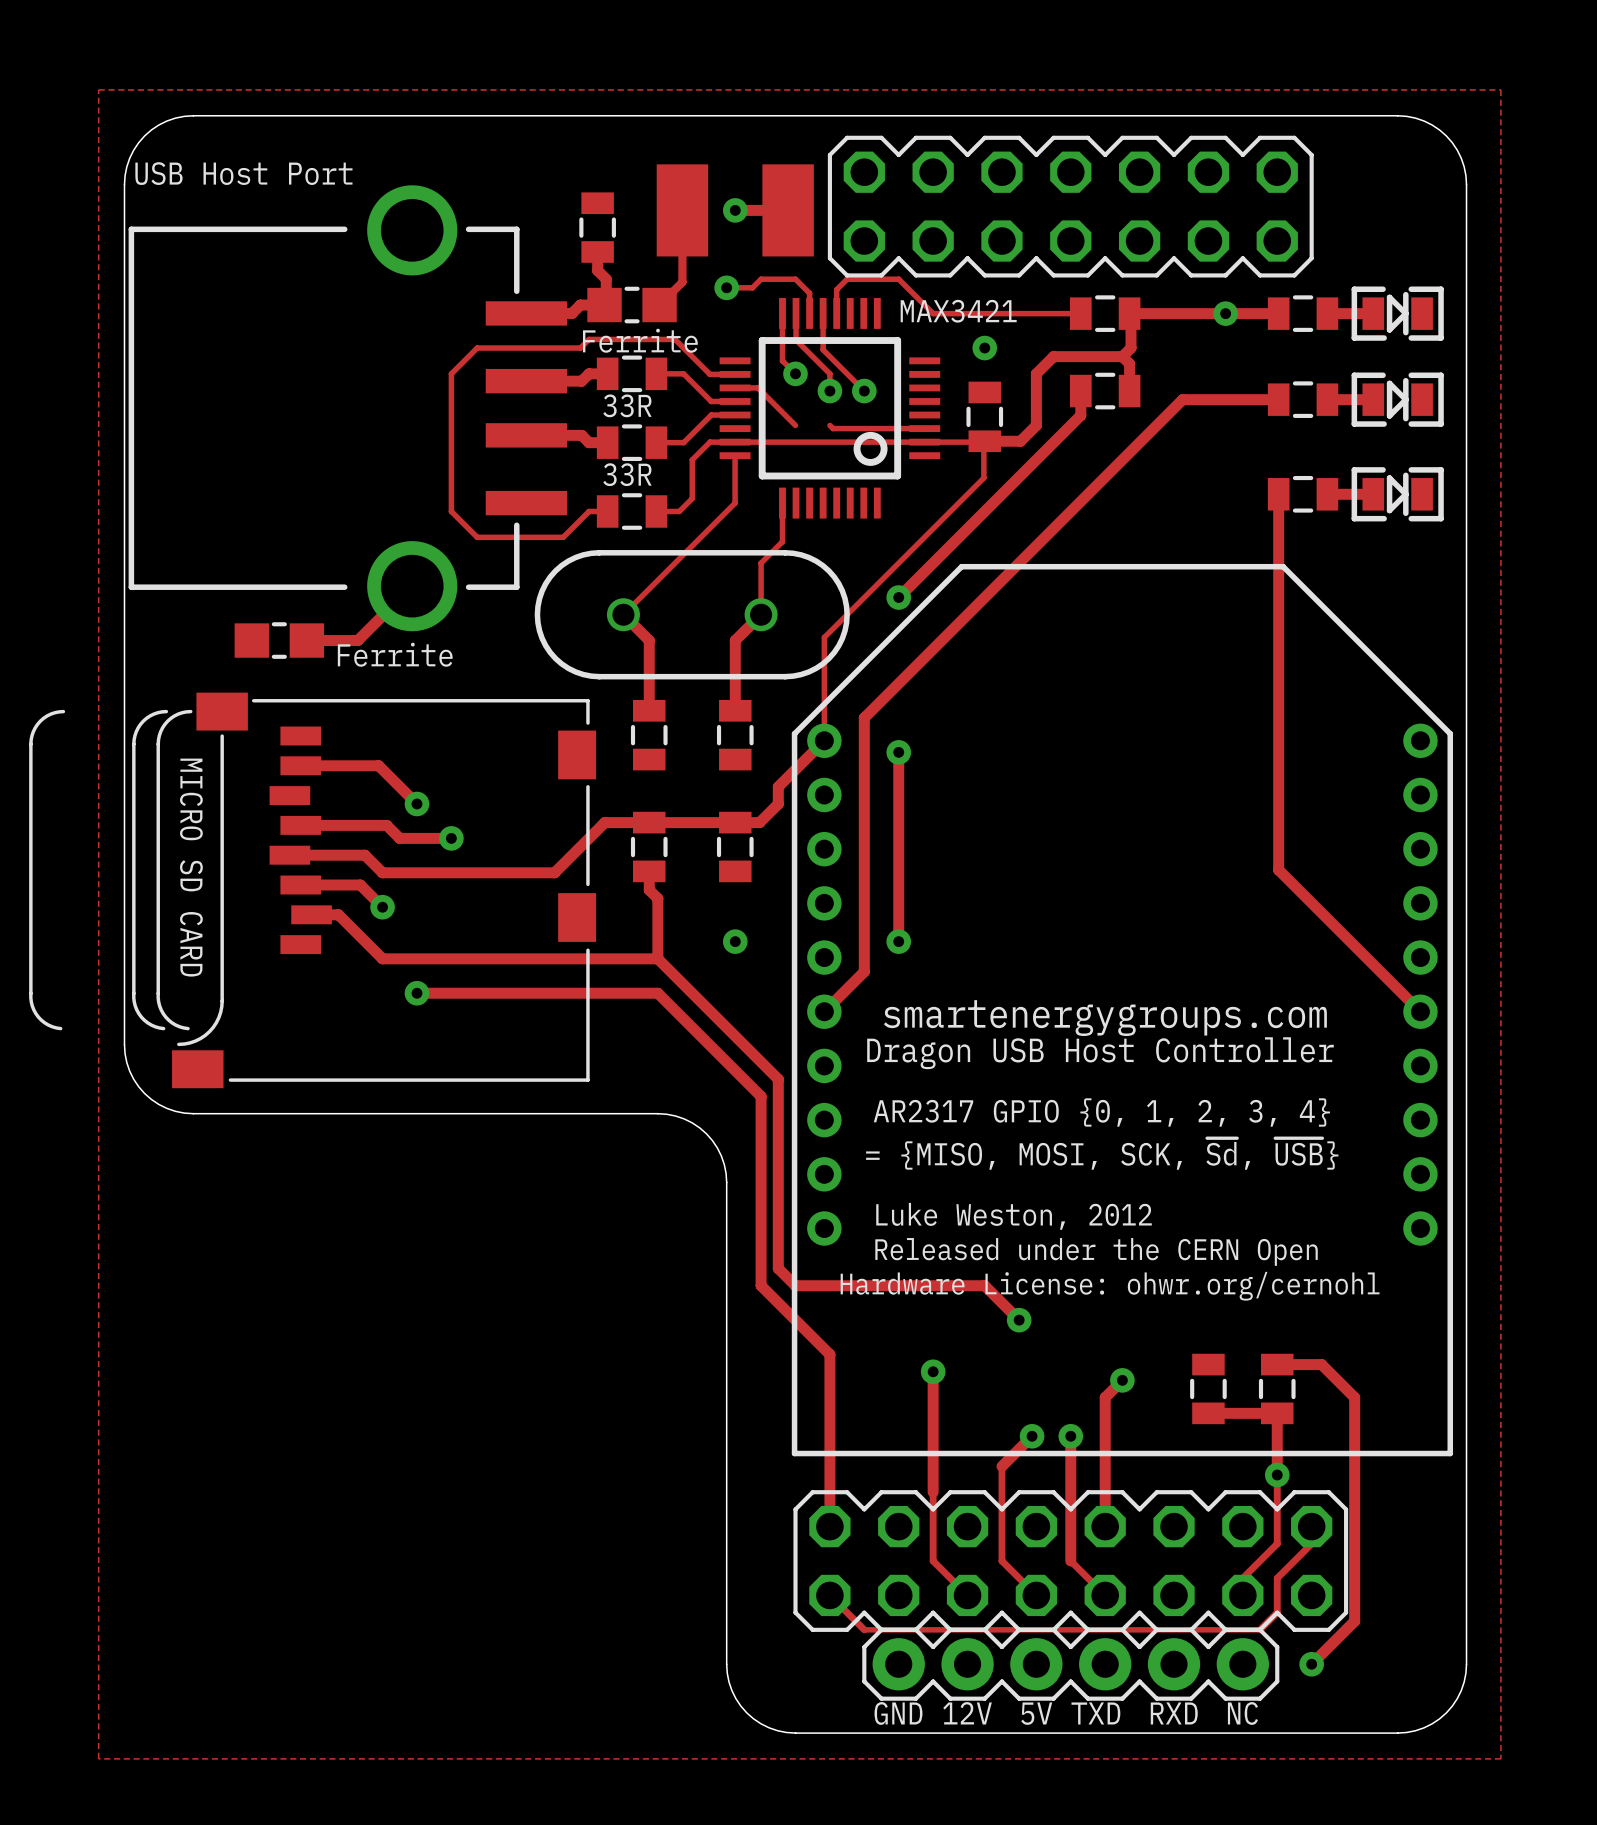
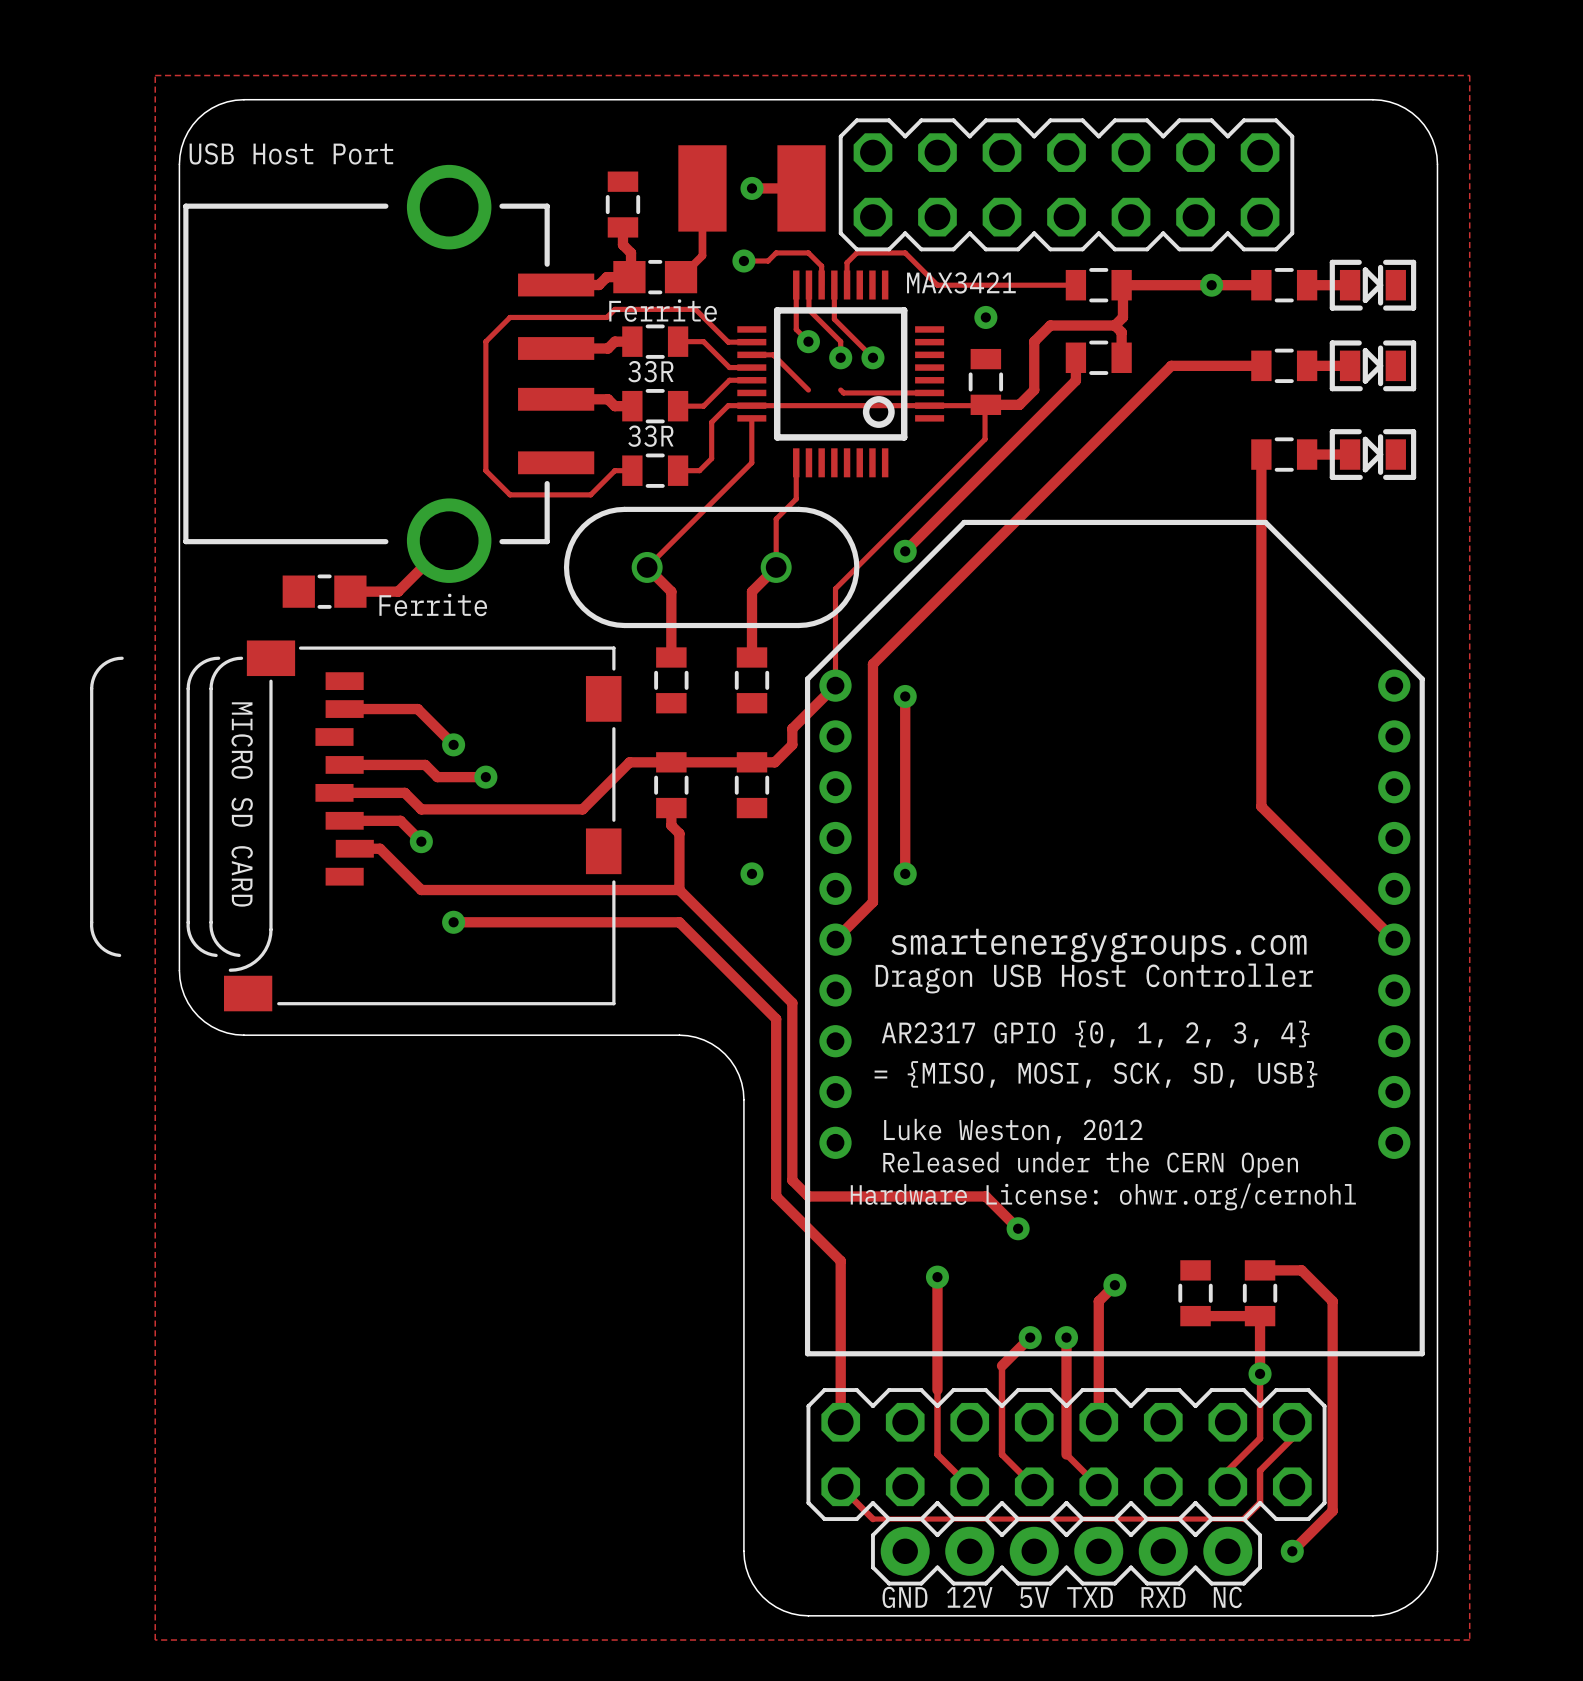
text: = {MISO, MOSI, SCK, ~{Sd}, ~{USB}} (1102, 1153) -> = {MISO, MOSI, SCK, SD, USB} (1096, 1074)

